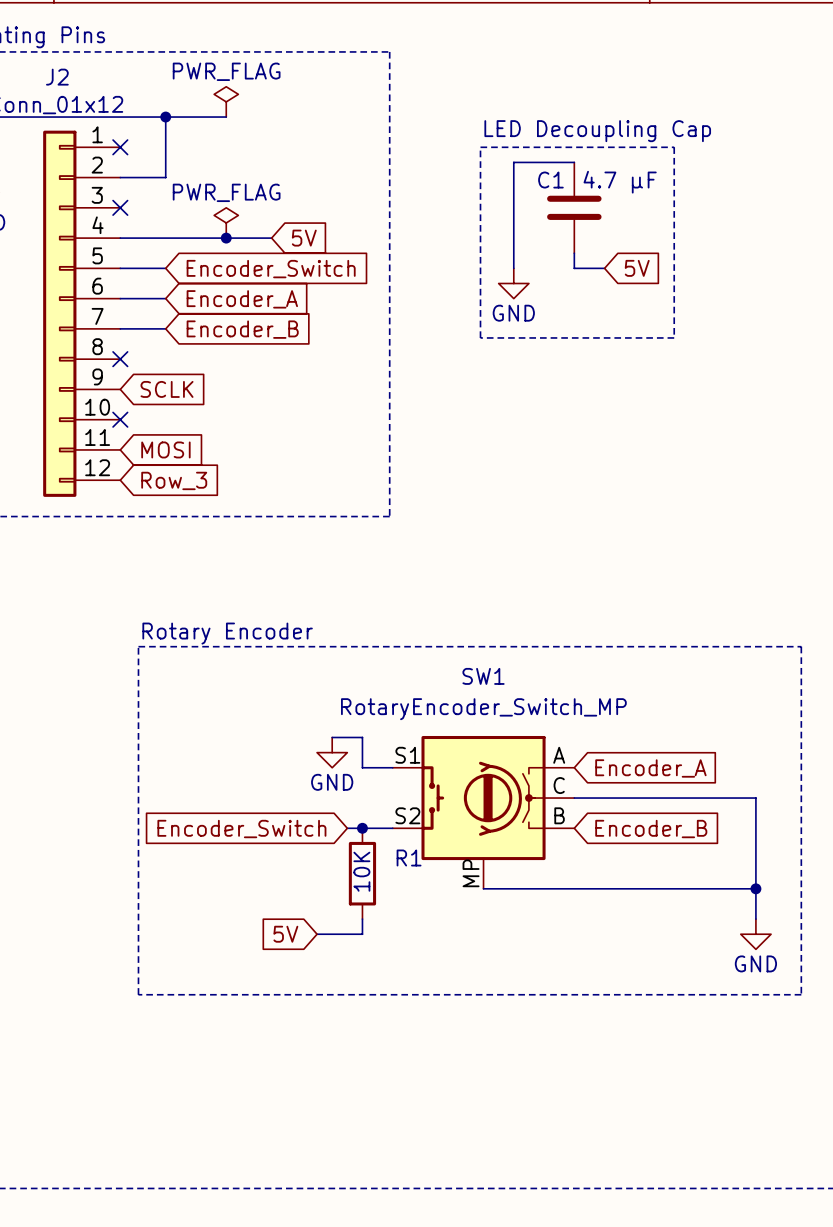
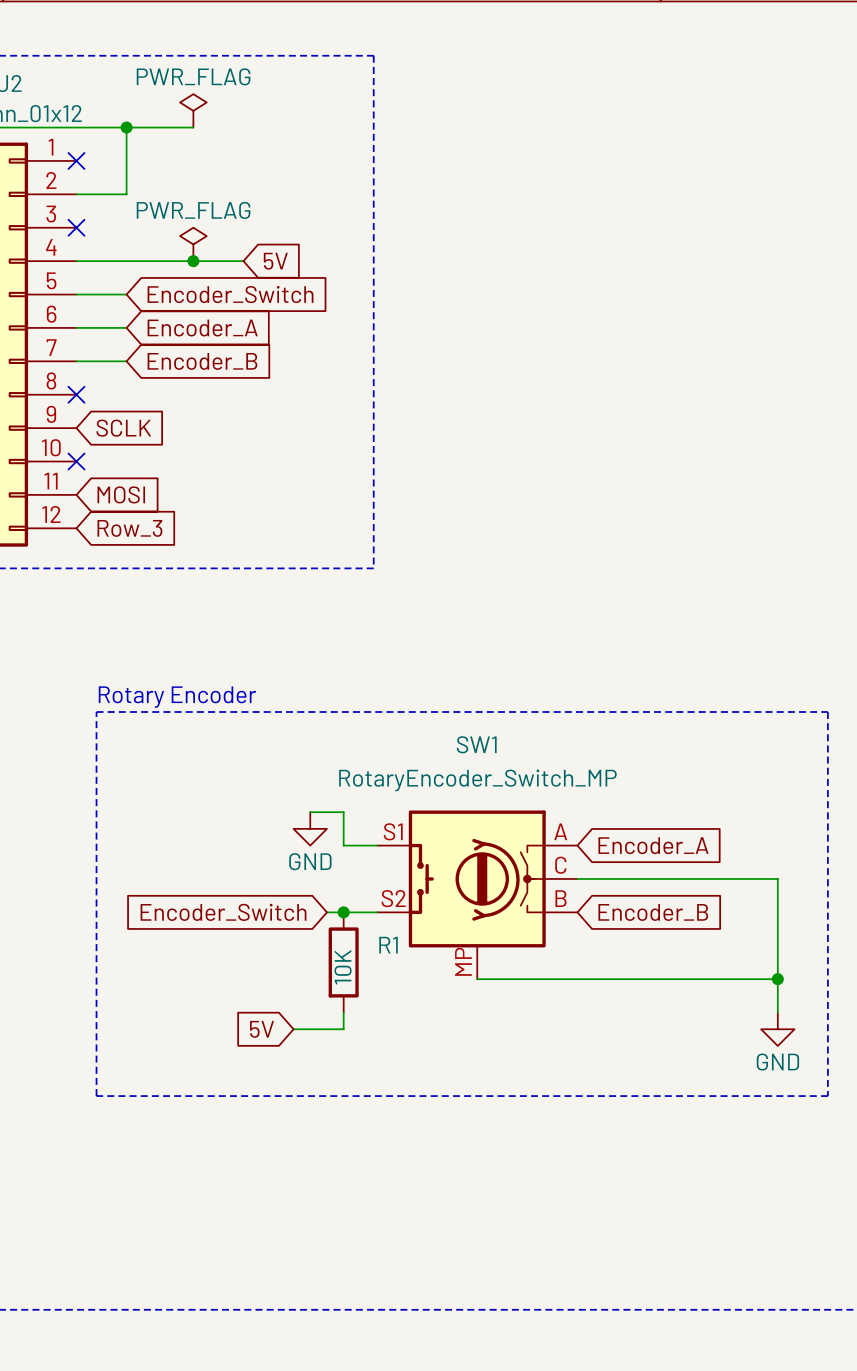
text: LED Decoupling Cap (597, 131) -> none
line: (480, 147) (674, 147) (674, 337) (480, 337) (480, 147) -> none
wire: (574, 162) (513, 162) (513, 268) -> none
C1: 4.7 µF (574, 207) -> none
wire: (574, 253) (574, 268) (604, 268) -> none
global label: 5V (637, 268) -> none
power symbol: GND (513, 283) -> none

